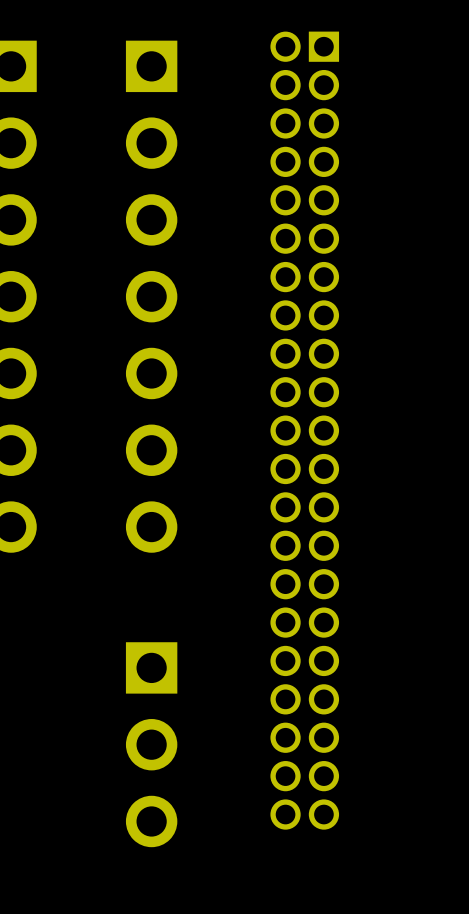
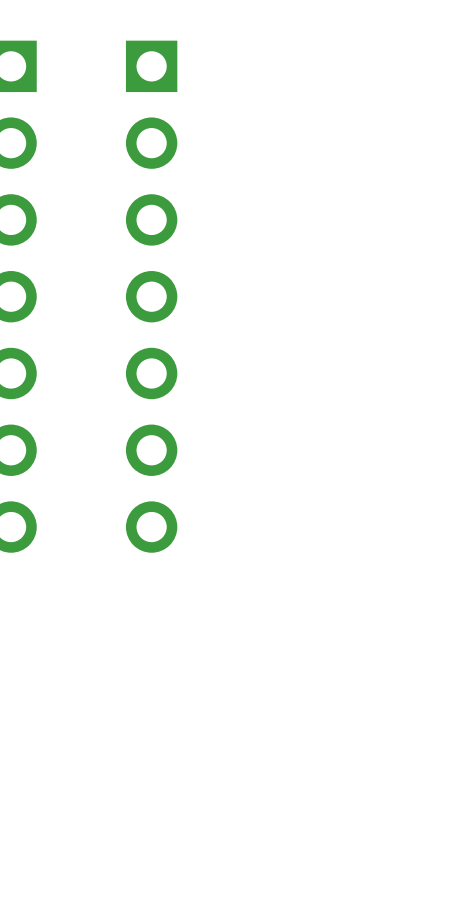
part: (304, 430) -> none
part: (151, 744) -> none

